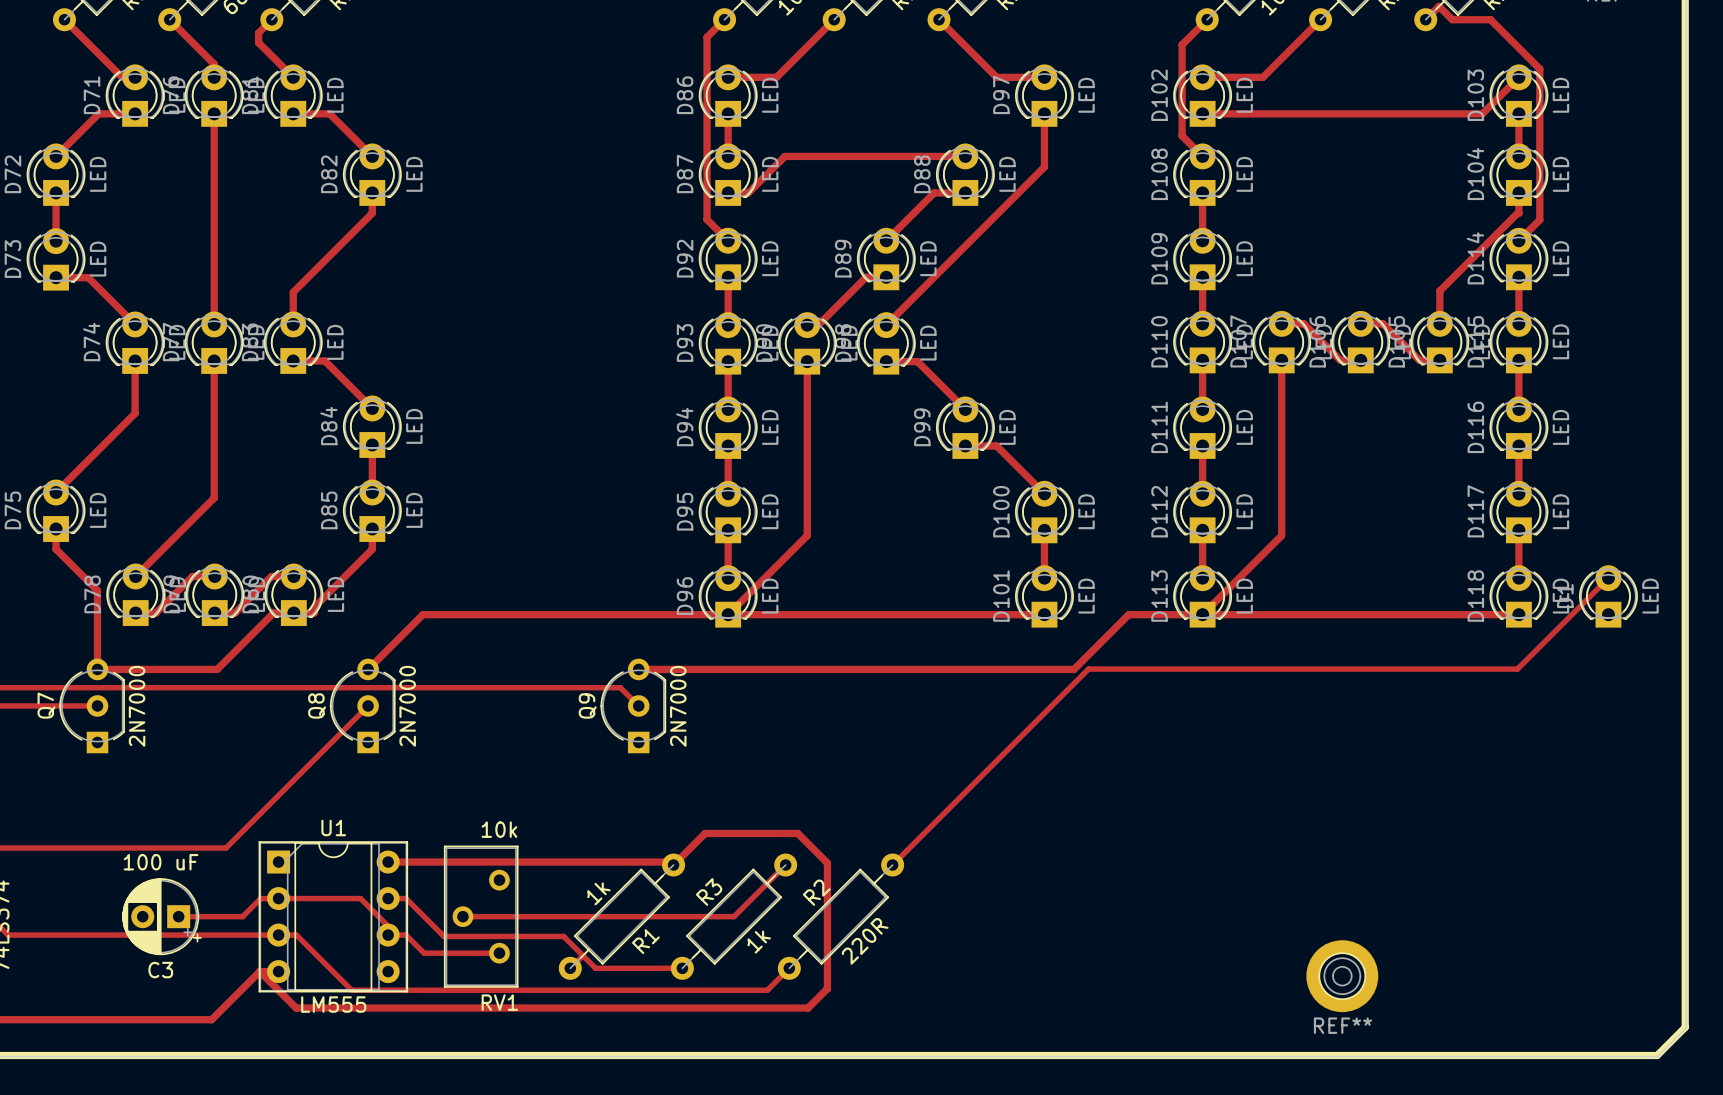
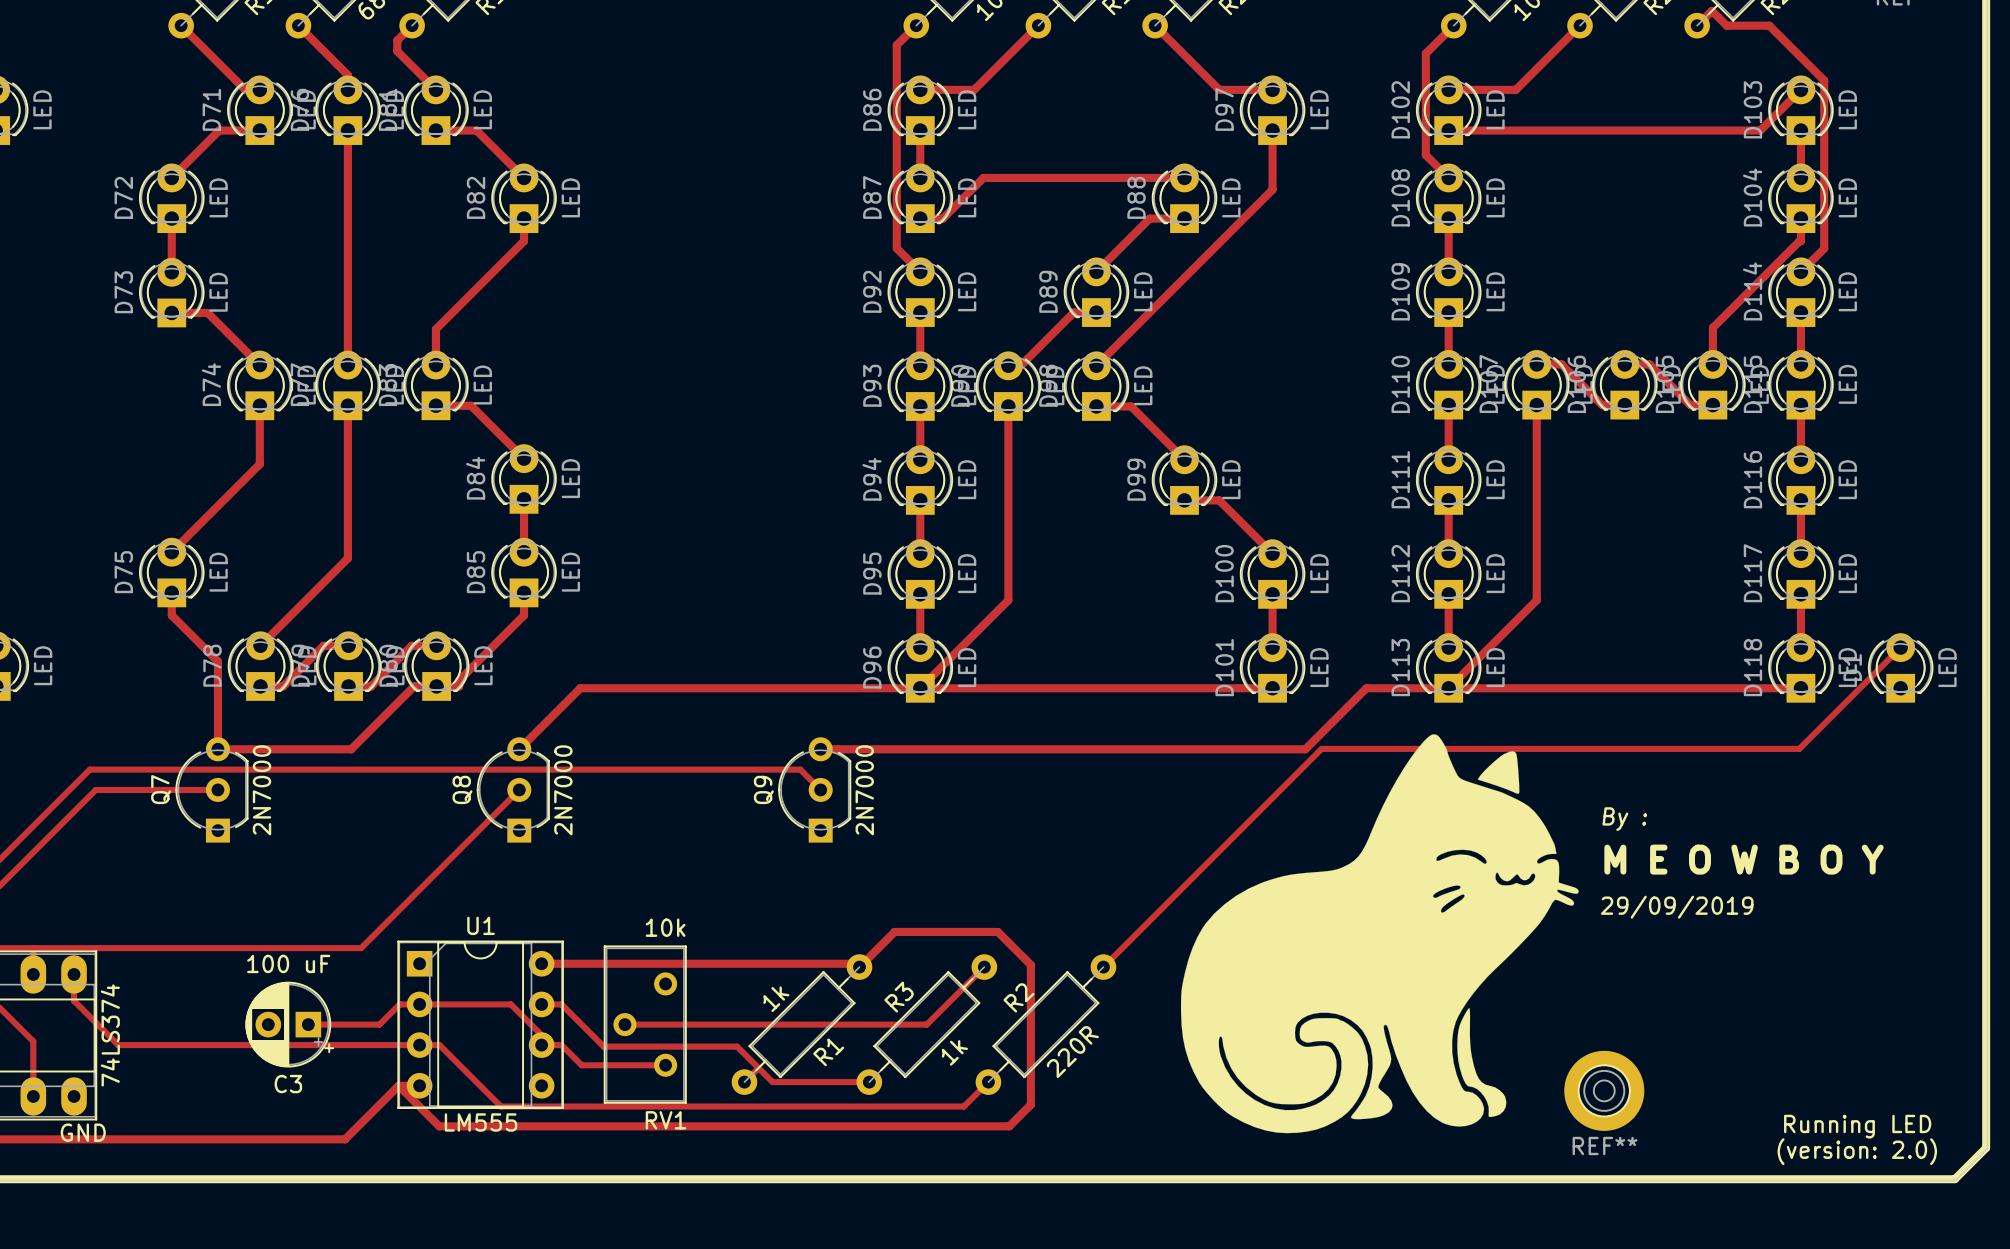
drawing: none -> [1180, 734, 1579, 1134]
text: none -> By : (1624, 819)
text: none -> M E O W B O Y (1744, 859)
text: none -> 29/09/2019 (1677, 907)
text: none -> Running LED (1857, 1126)
text: none -> (version: 2.0) (1857, 1151)

